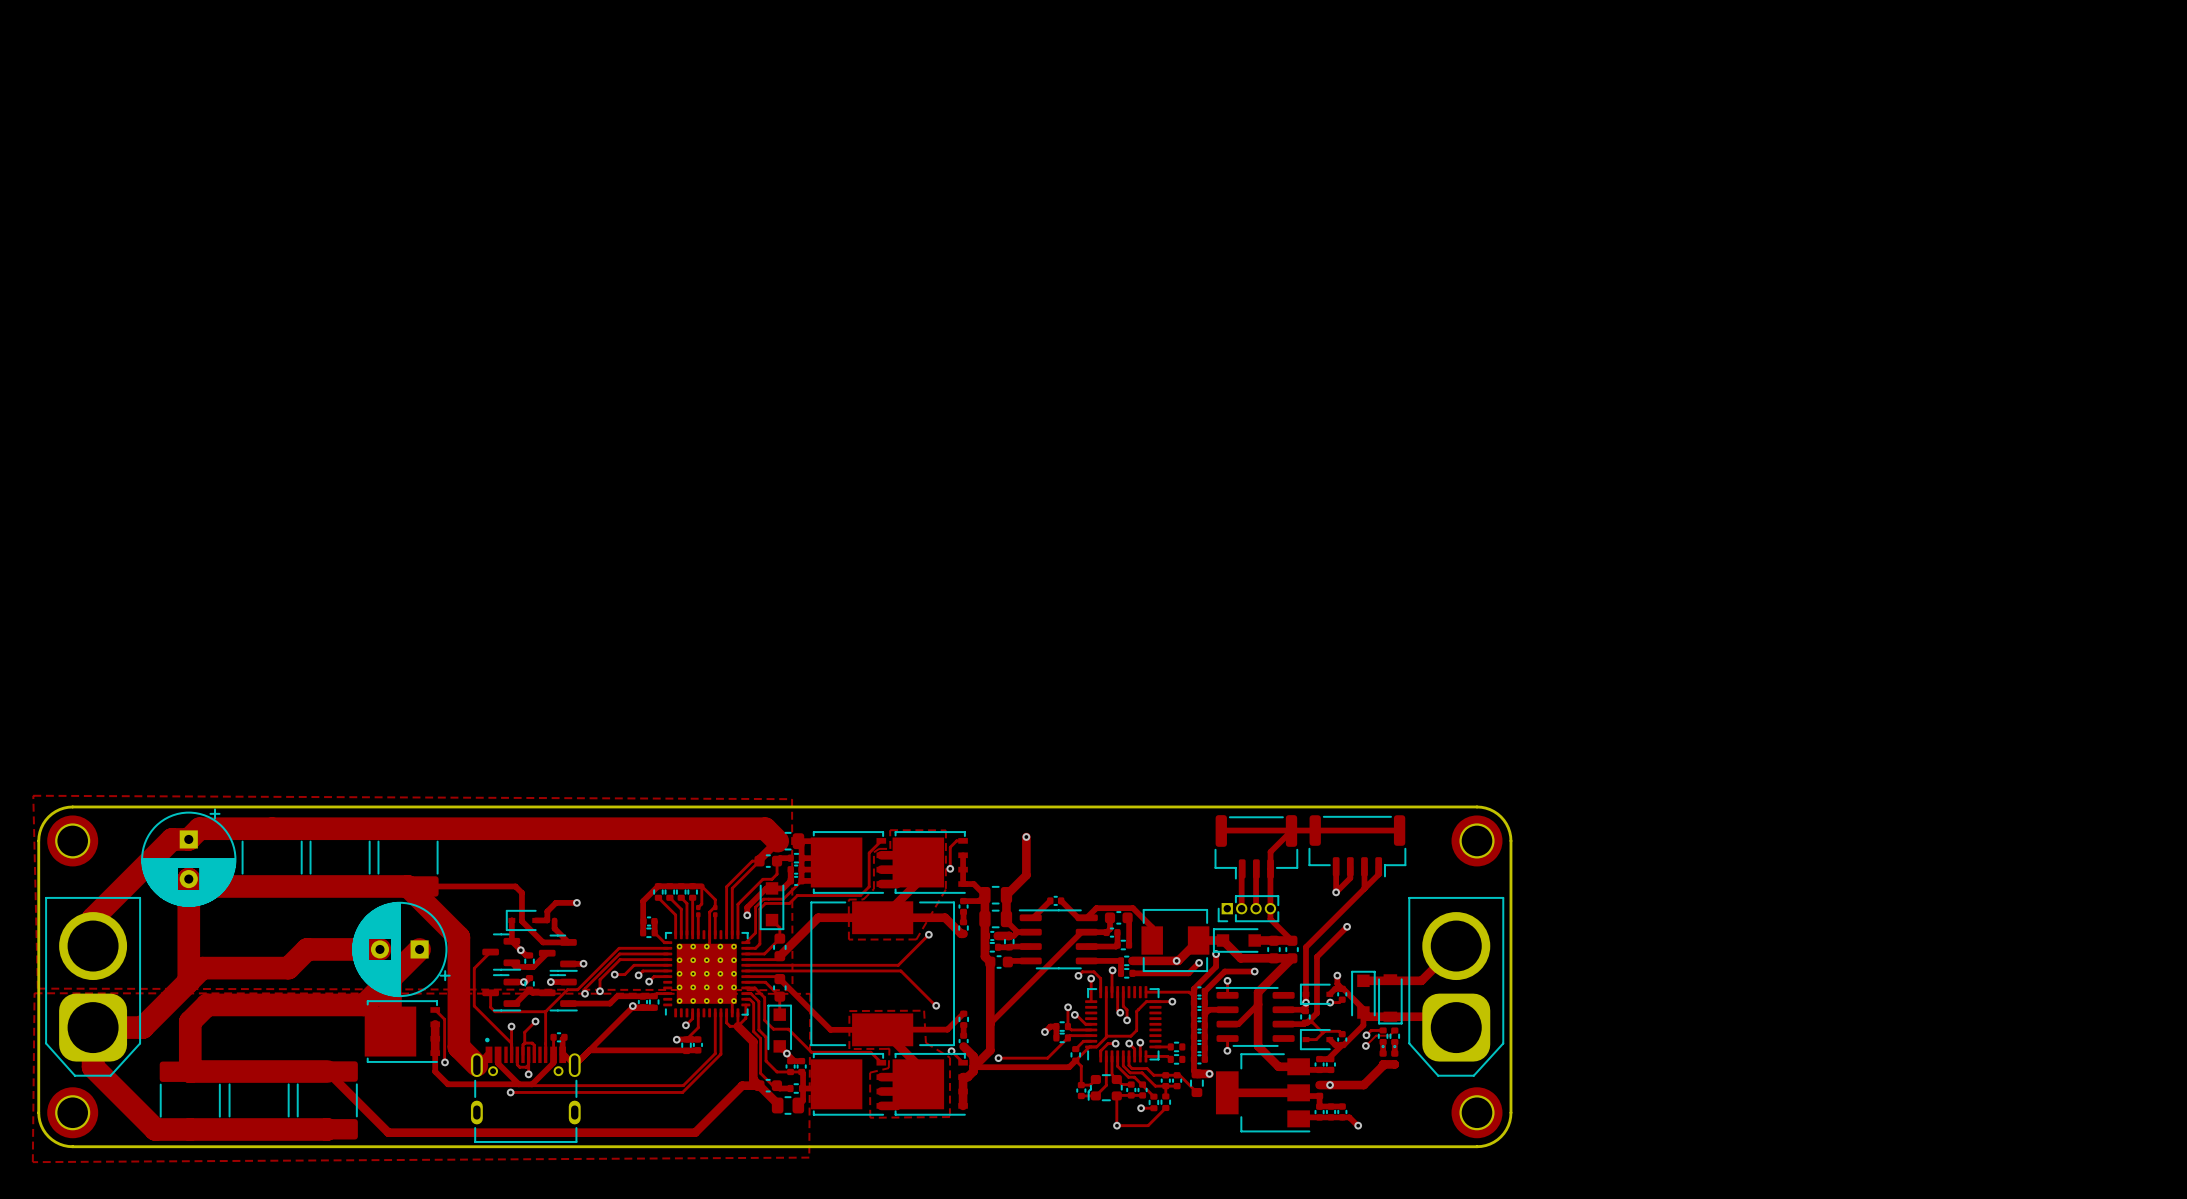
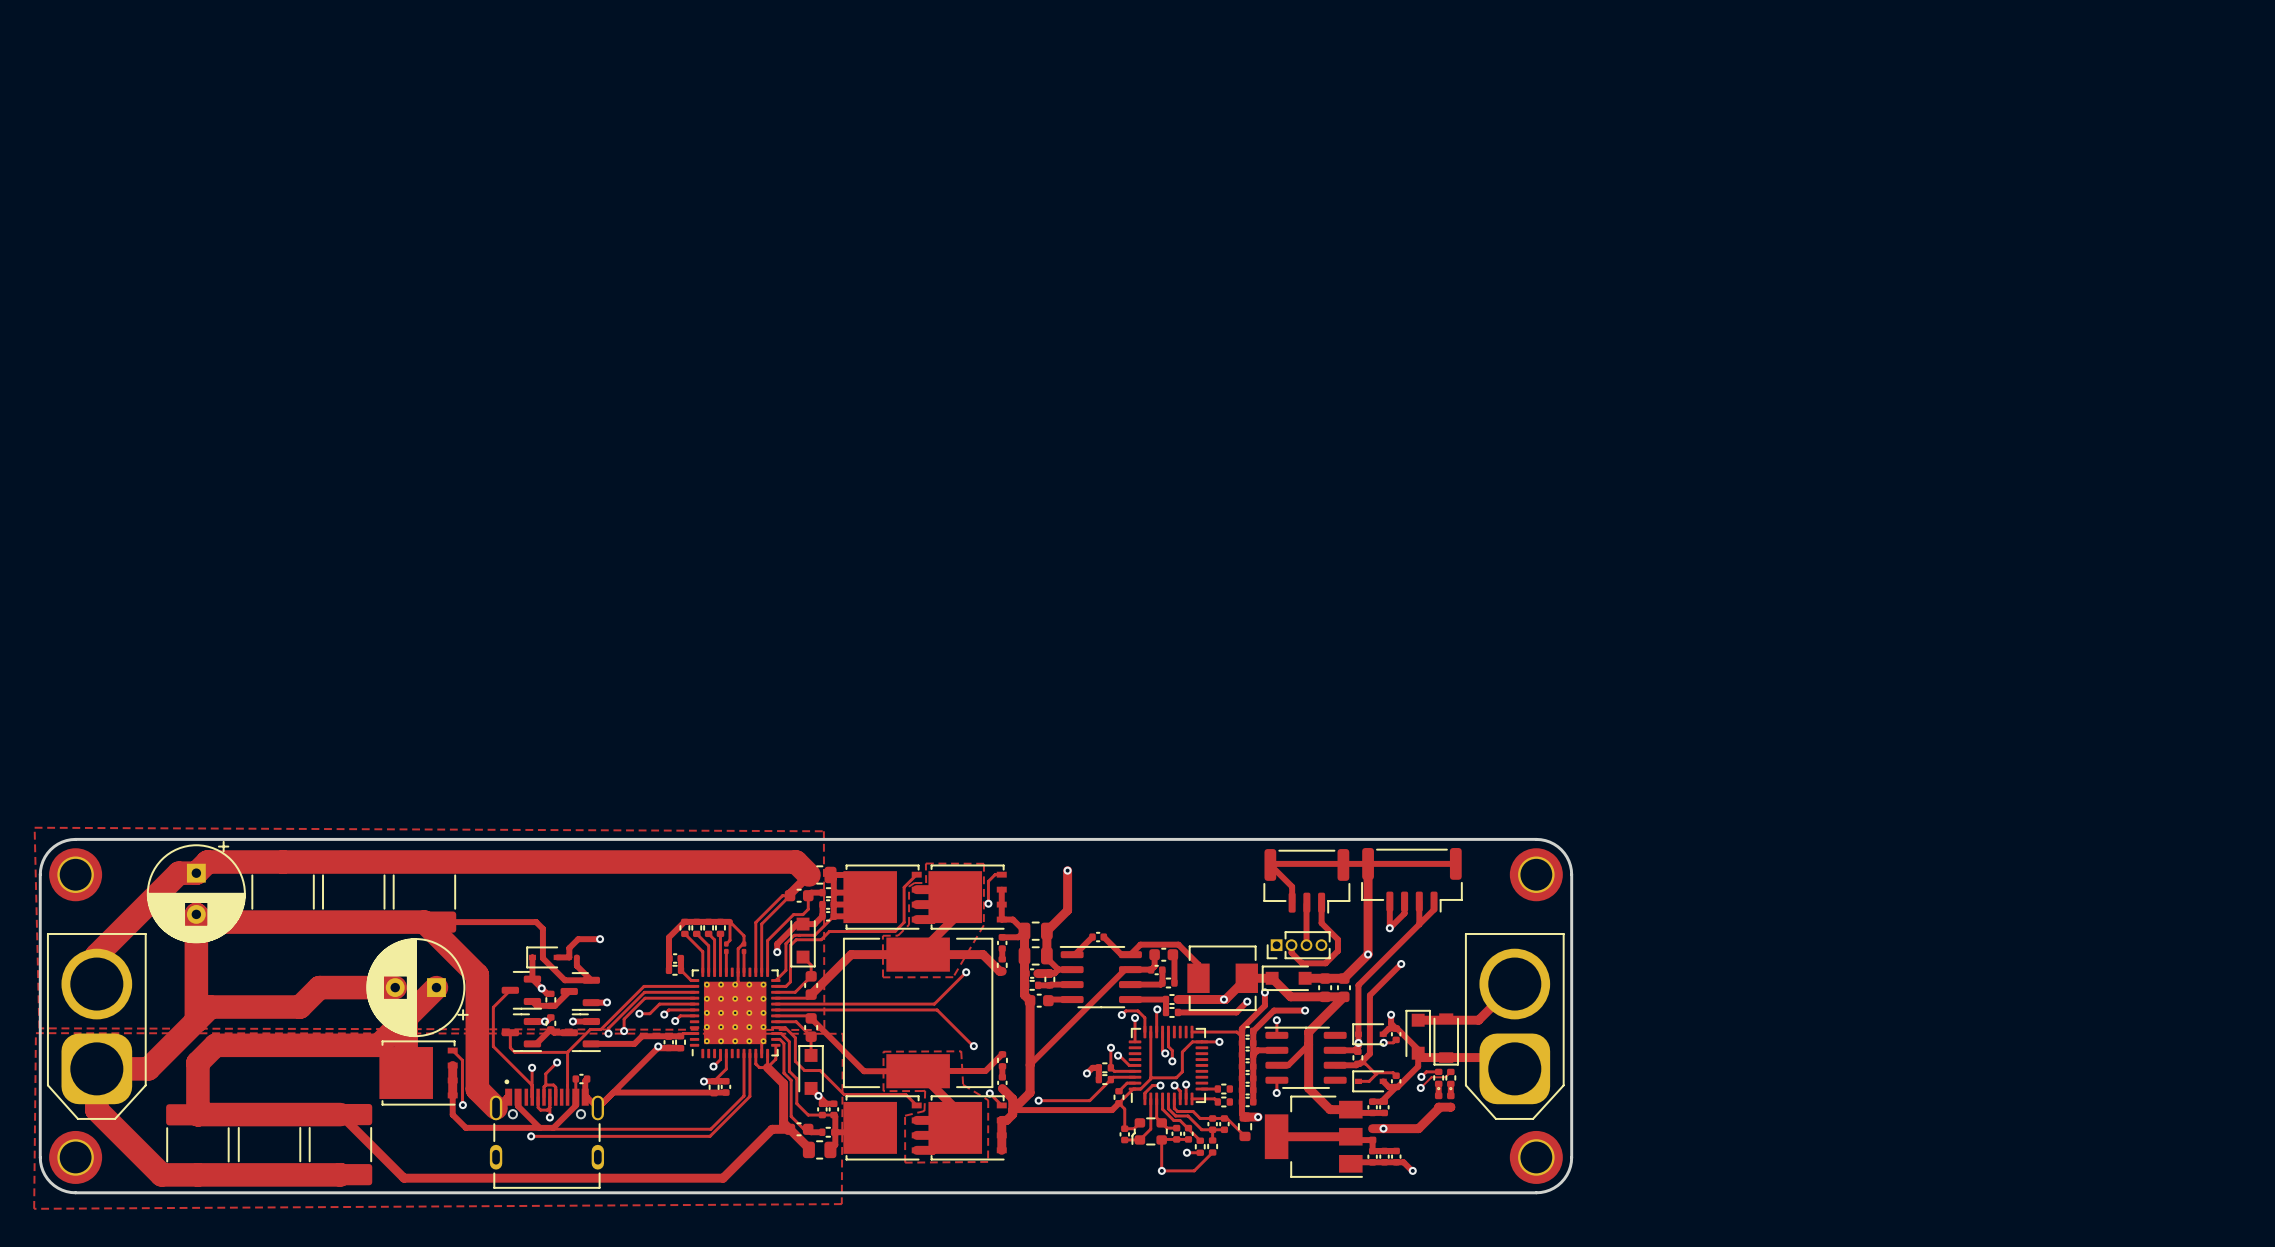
part footprint: [1214, 815, 1298, 880] -> [1263, 849, 1351, 914]
track: (1291, 830) (1270, 851) (1270, 867) -> none
track: none -> (1270, 864) (1292, 886) (1292, 902)
track: (1241, 869) (1241, 908) -> (1321, 903) (1321, 923) (1337, 939) (1337, 950) (1325, 963) (1302, 963) (1291, 952) (1291, 945)
track: (1270, 869) (1270, 919) (1292, 940) -> (1368, 863) (1368, 954) (1343, 978)
via: none -> (1368, 954)

